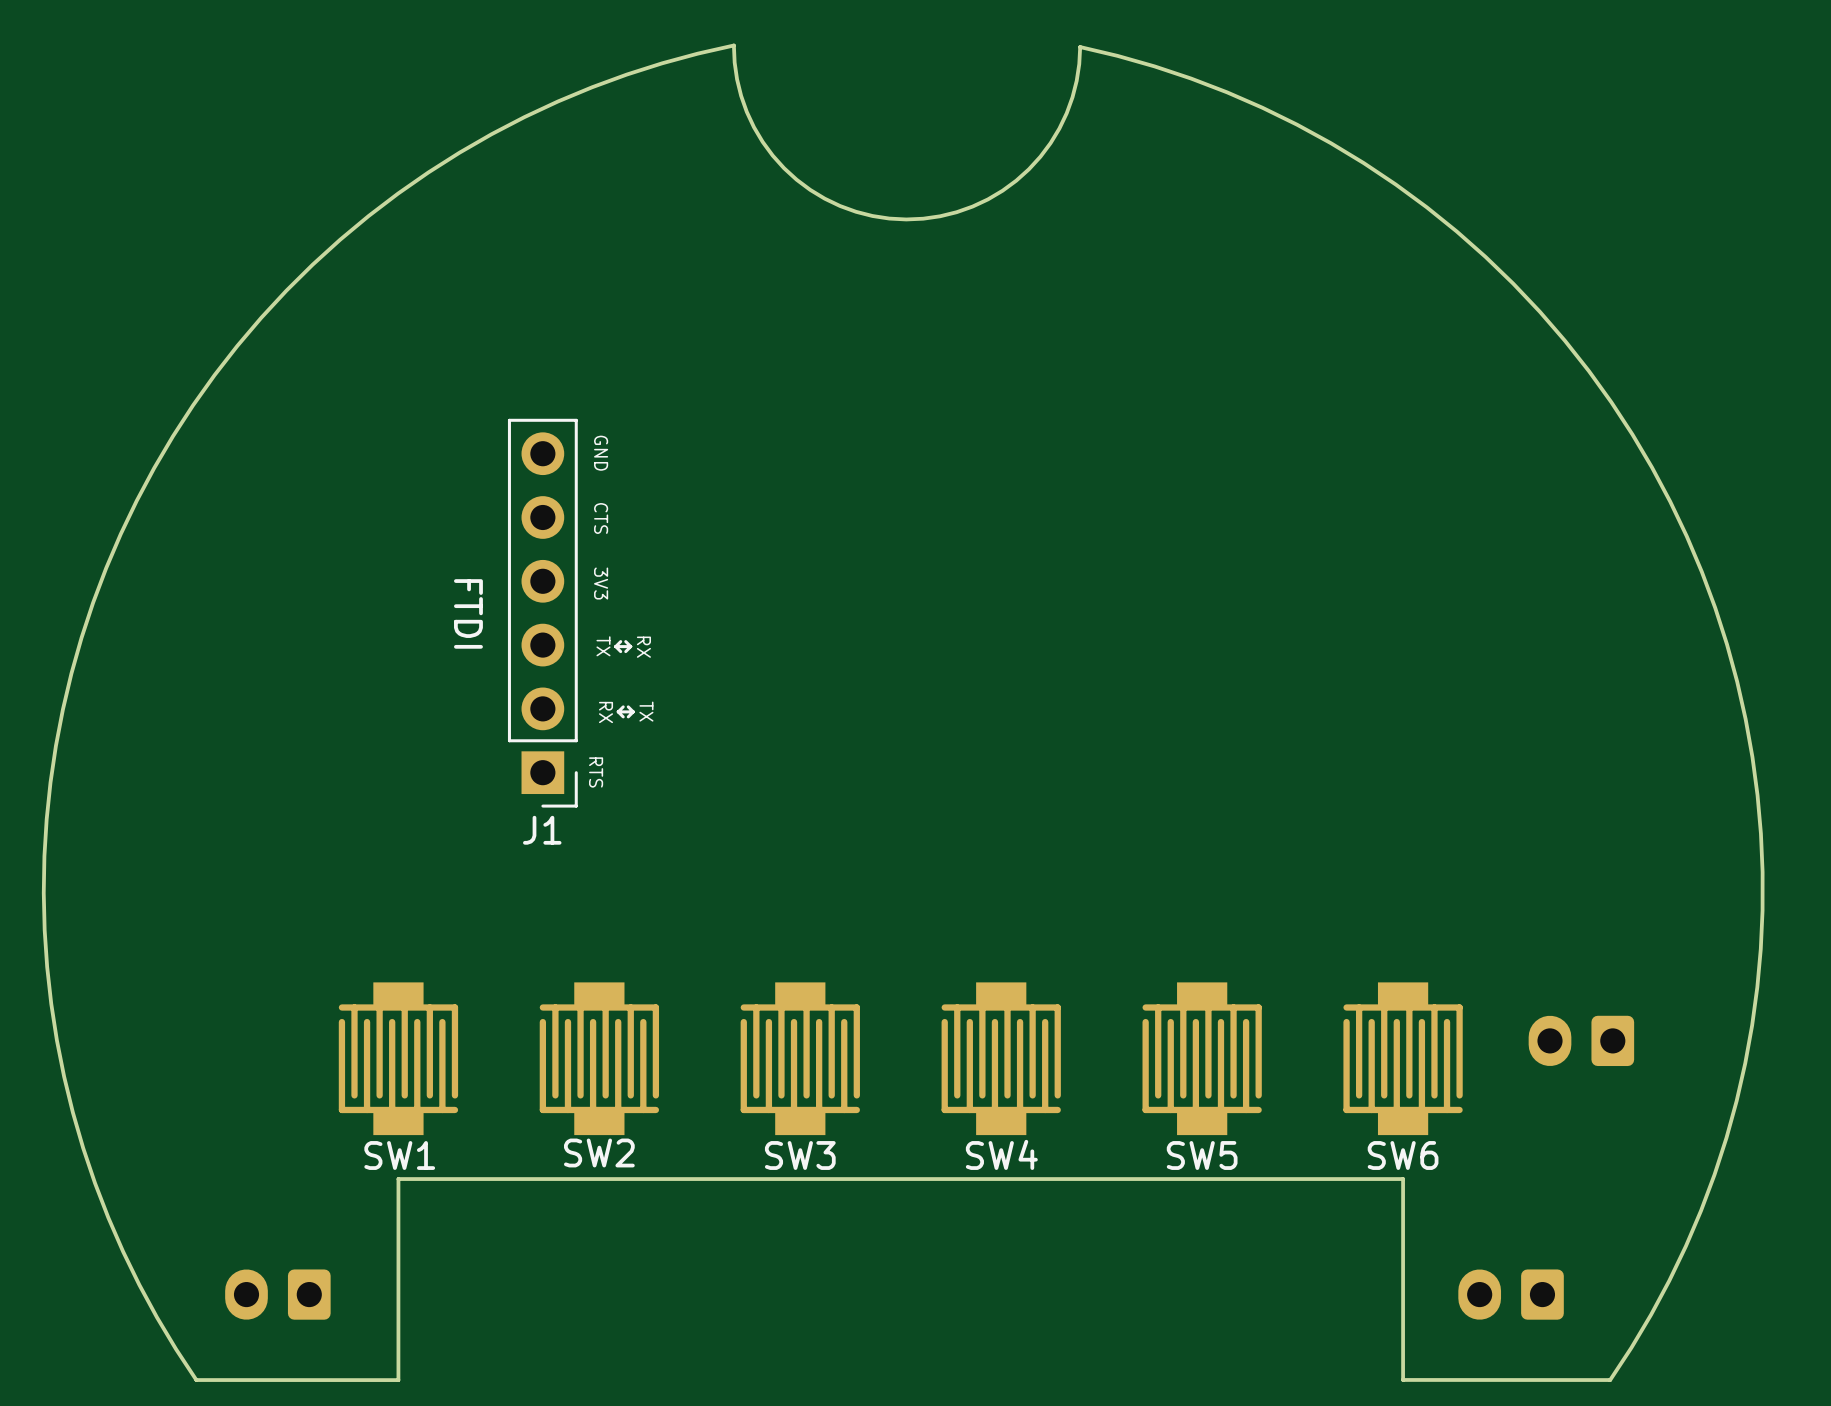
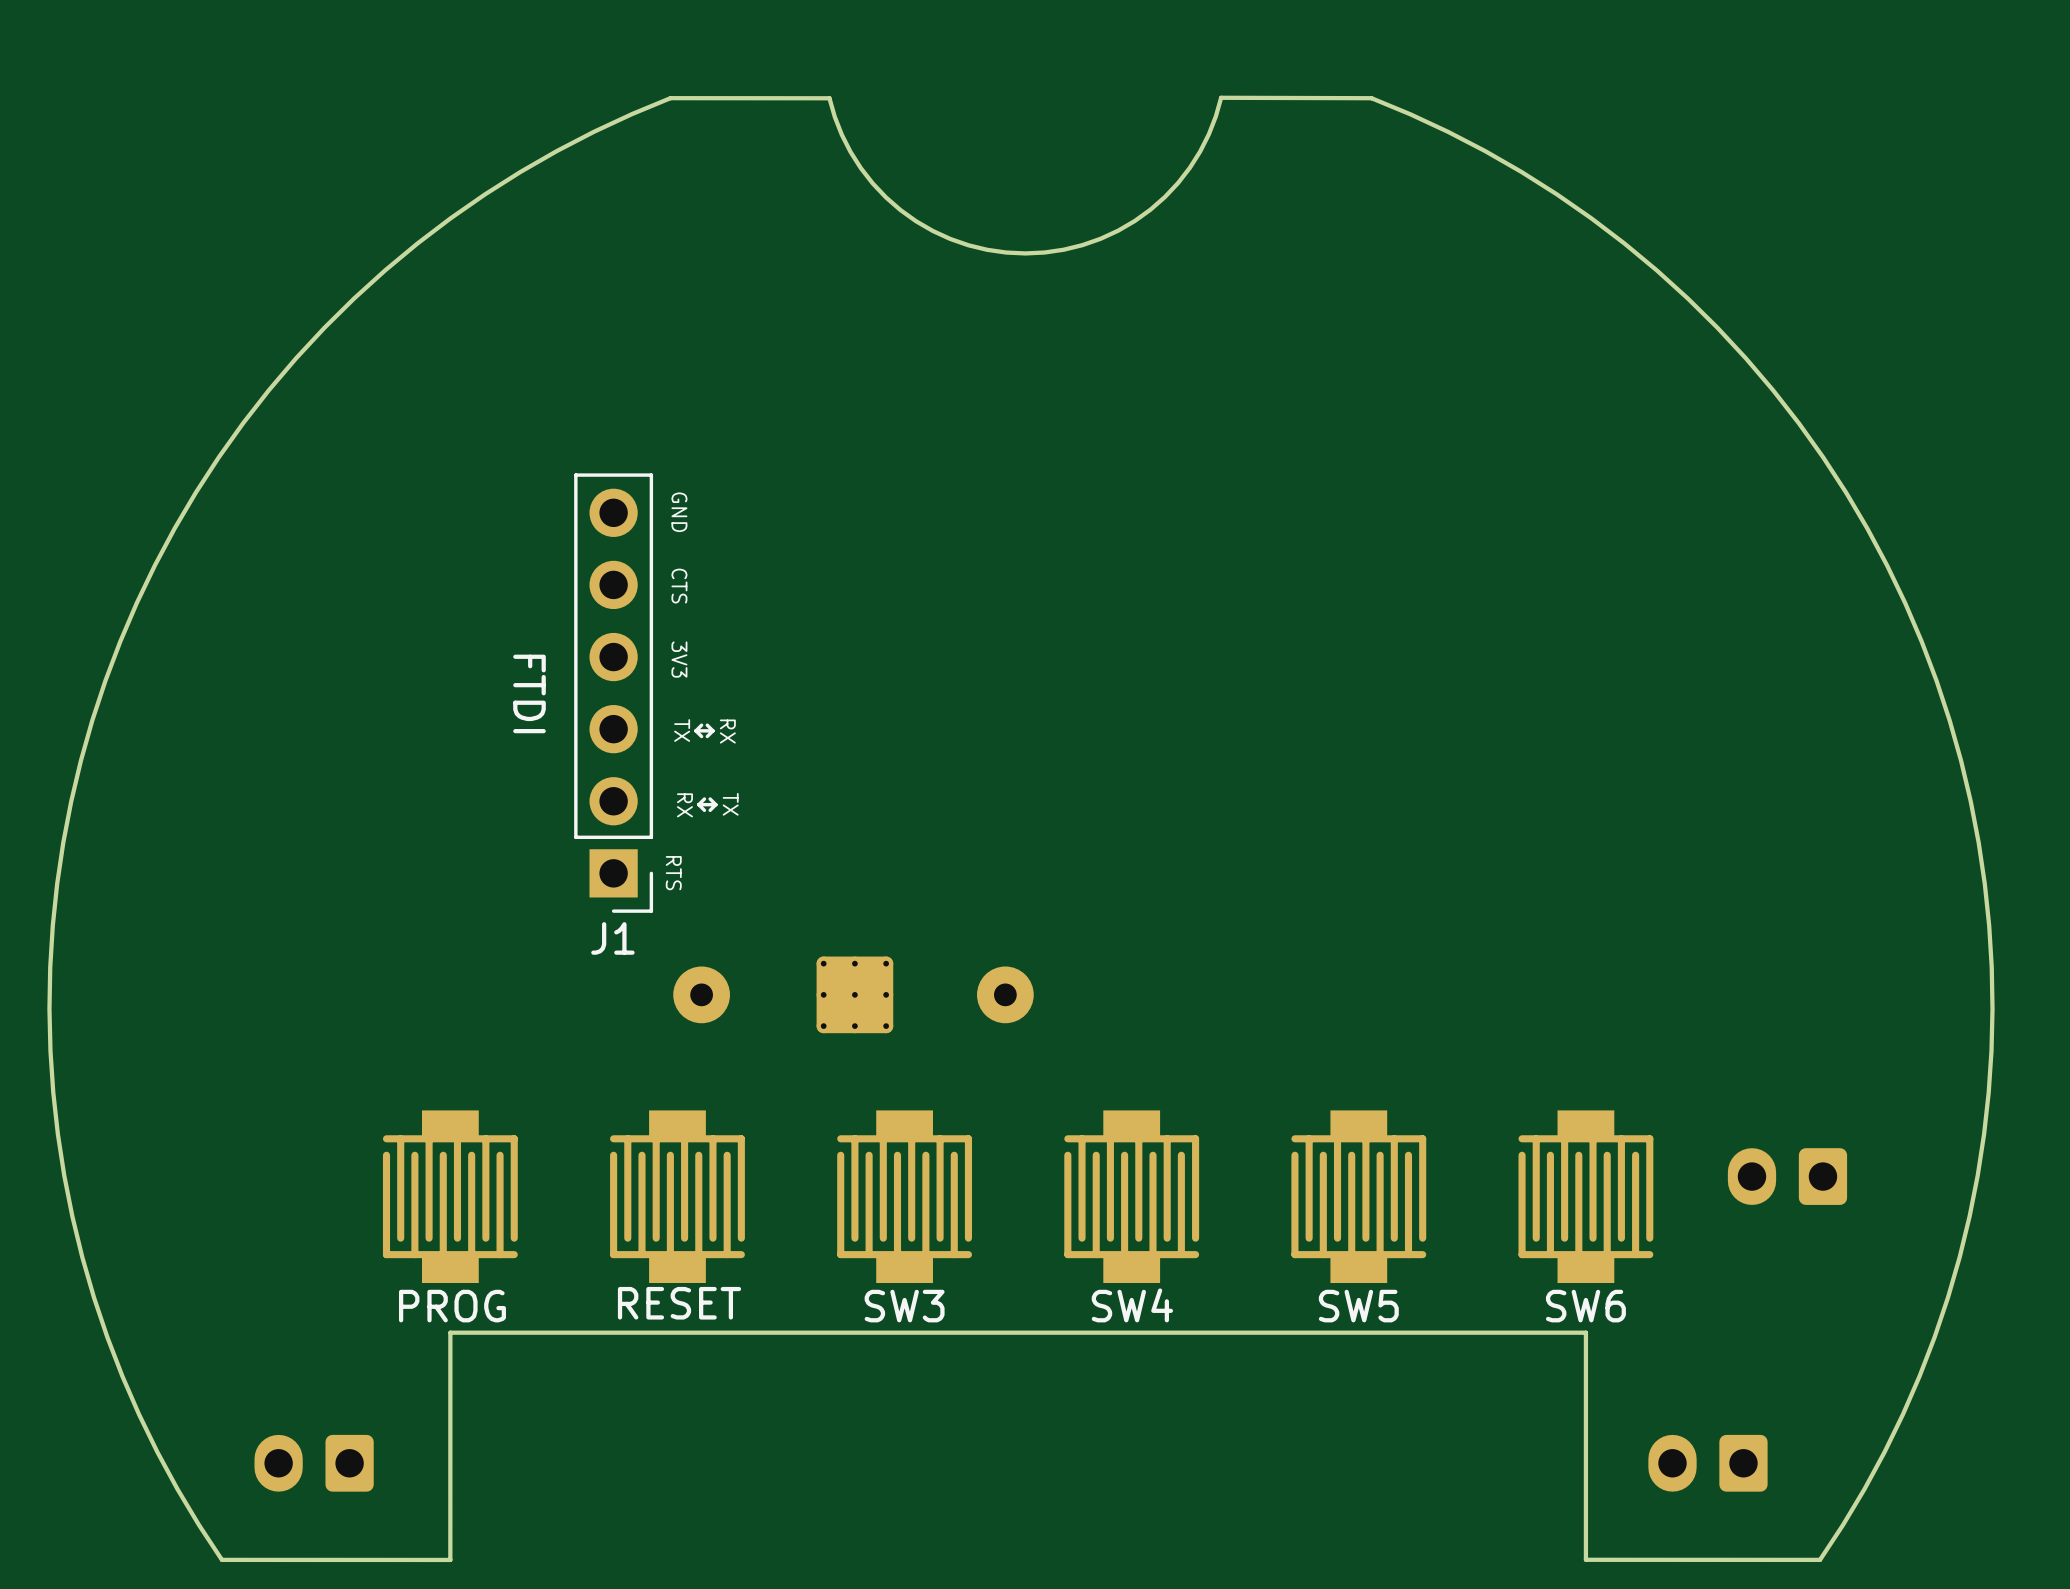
part: none -> (701, 994)
part: none -> (854, 994)
part: none -> (1005, 994)
SW2 name: SW2 (599, 1152) -> RESET (679, 1303)
SW1 name: SW1 (399, 1155) -> PROG (452, 1306)
board edge: (1610, 1380) (1651, 1314) (1685, 1246) (1714, 1174) (1726, 1138) (1745, 1063) (1752, 1025) (1760, 949) (1762, 910) (1760, 833) (1752, 757) (1745, 719) (1727, 644) (1715, 607) (1686, 536) (1652, 467) (1611, 402) (1588, 370) (1539, 311) (1513, 283) (1456, 231) (1395, 184) (1363, 163) (1297, 124) (1227, 92) (1154, 66) (1080, 47) (1076, 80) (1066, 113) (1050, 143) (1028, 169) (1002, 190) (972, 206) (940, 216) (906, 219) (889, 218) (872, 215) (840, 206) (810, 189) (784, 168) (762, 141) (746, 111) (737, 79) (733, 45) (662, 63) (592, 87) (557, 101) (491, 134) (459, 152) (428, 172) (368, 216) (312, 264) (286, 290) (237, 345) (214, 375) (193, 405) (154, 468) (136, 500) (106, 568) (93, 602) (71, 673) (62, 709) (50, 782) (44, 856) (43, 893) (47, 967) (56, 1040) (64, 1076) (83, 1148) (95, 1183) (123, 1251) (139, 1284) (156, 1317) (196, 1380) -> (1820, 1559) (1864, 1489) (1884, 1452) (1919, 1376) (1934, 1337) (1947, 1297) (1969, 1216) (1977, 1175) (1988, 1092) (1992, 1009) (1991, 967) (1984, 883) (1978, 842) (1961, 760) (1936, 680) (1921, 641) (1887, 565) (1867, 528) (1823, 457) (1798, 423) (1773, 390) (1717, 327) (1687, 298) (1624, 243) (1556, 194) (1485, 151) (1448, 131) (1371, 98) (1221, 97) (1215, 116) (1200, 151) (1178, 182) (1150, 209) (1118, 230) (1082, 245) (1044, 252) (1025, 253) (987, 249) (950, 238) (916, 221) (900, 210) (885, 197) (860, 168) (841, 134) (829, 98) (670, 98) (593, 131) (520, 171) (485, 194) (417, 243) (385, 270) (324, 327) (268, 390) (218, 457) (174, 528) (136, 603) (105, 680) (92, 720) (71, 801) (63, 842) (52, 925) (49, 1009) (53, 1092) (64, 1175) (82, 1257) (93, 1297) (122, 1376) (139, 1414) (177, 1489) (221, 1559)

